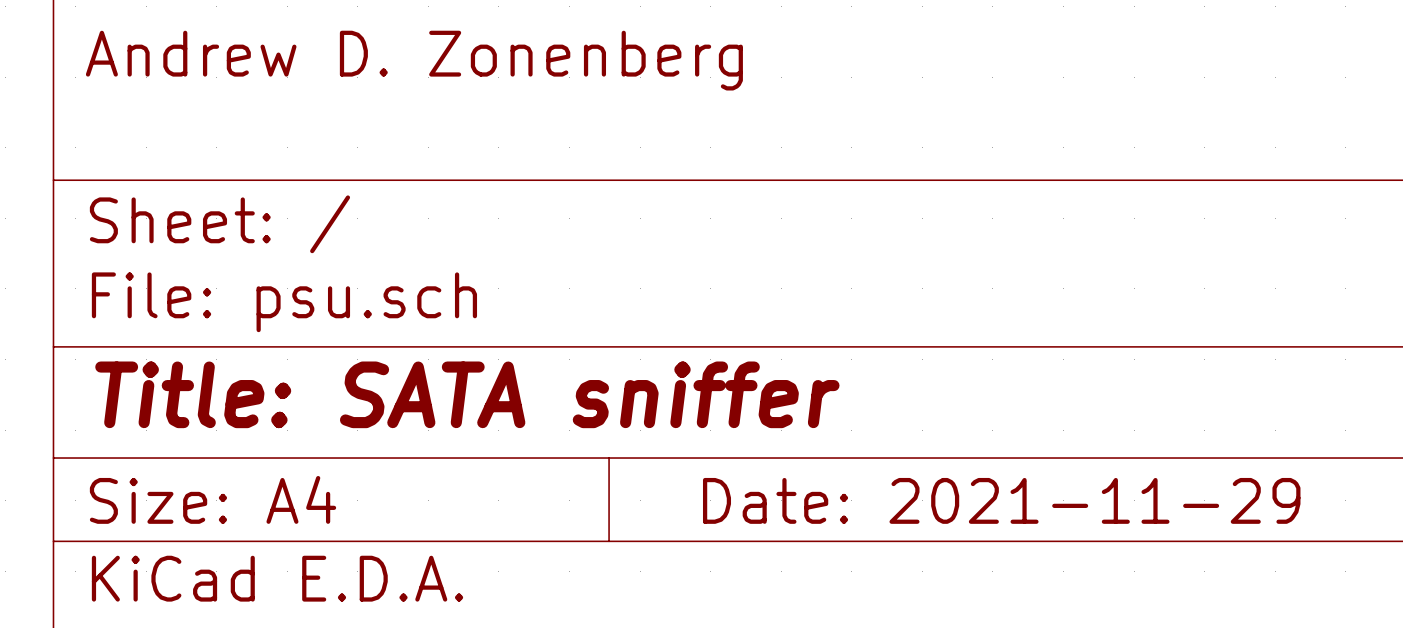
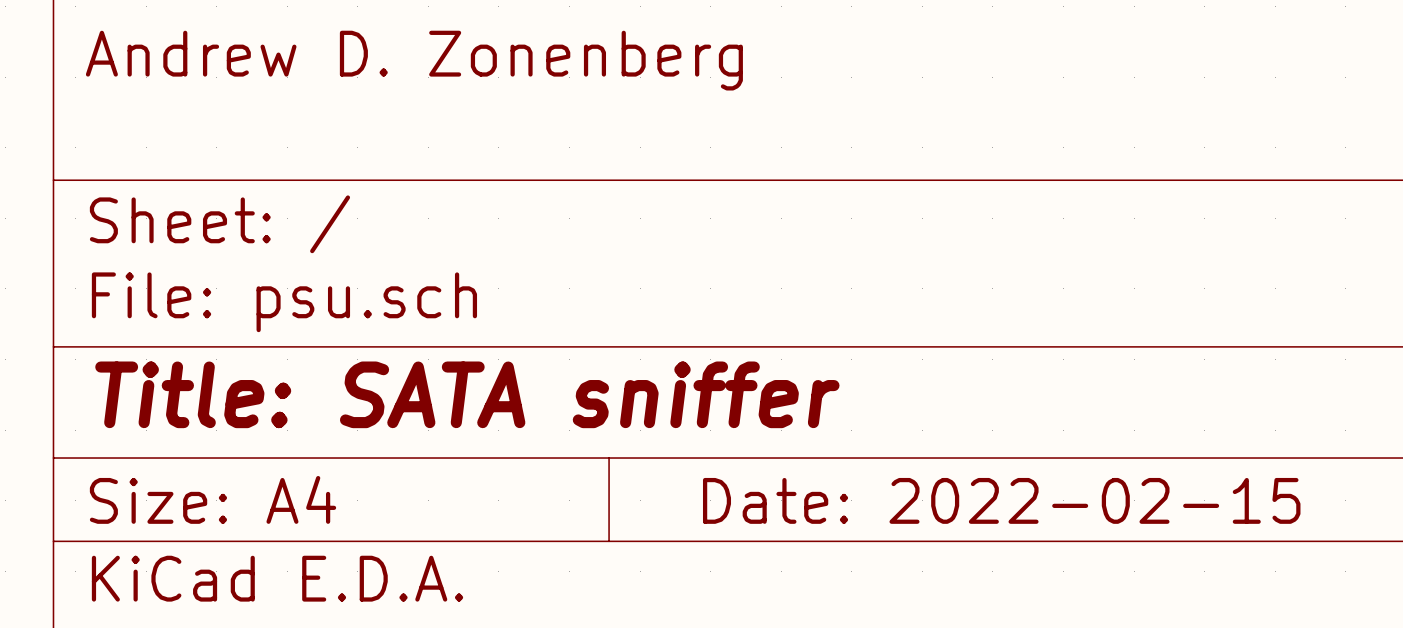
title block: Date: 2021-11-29 (1001, 500) -> Date: 2022-02-15 (1001, 500)

